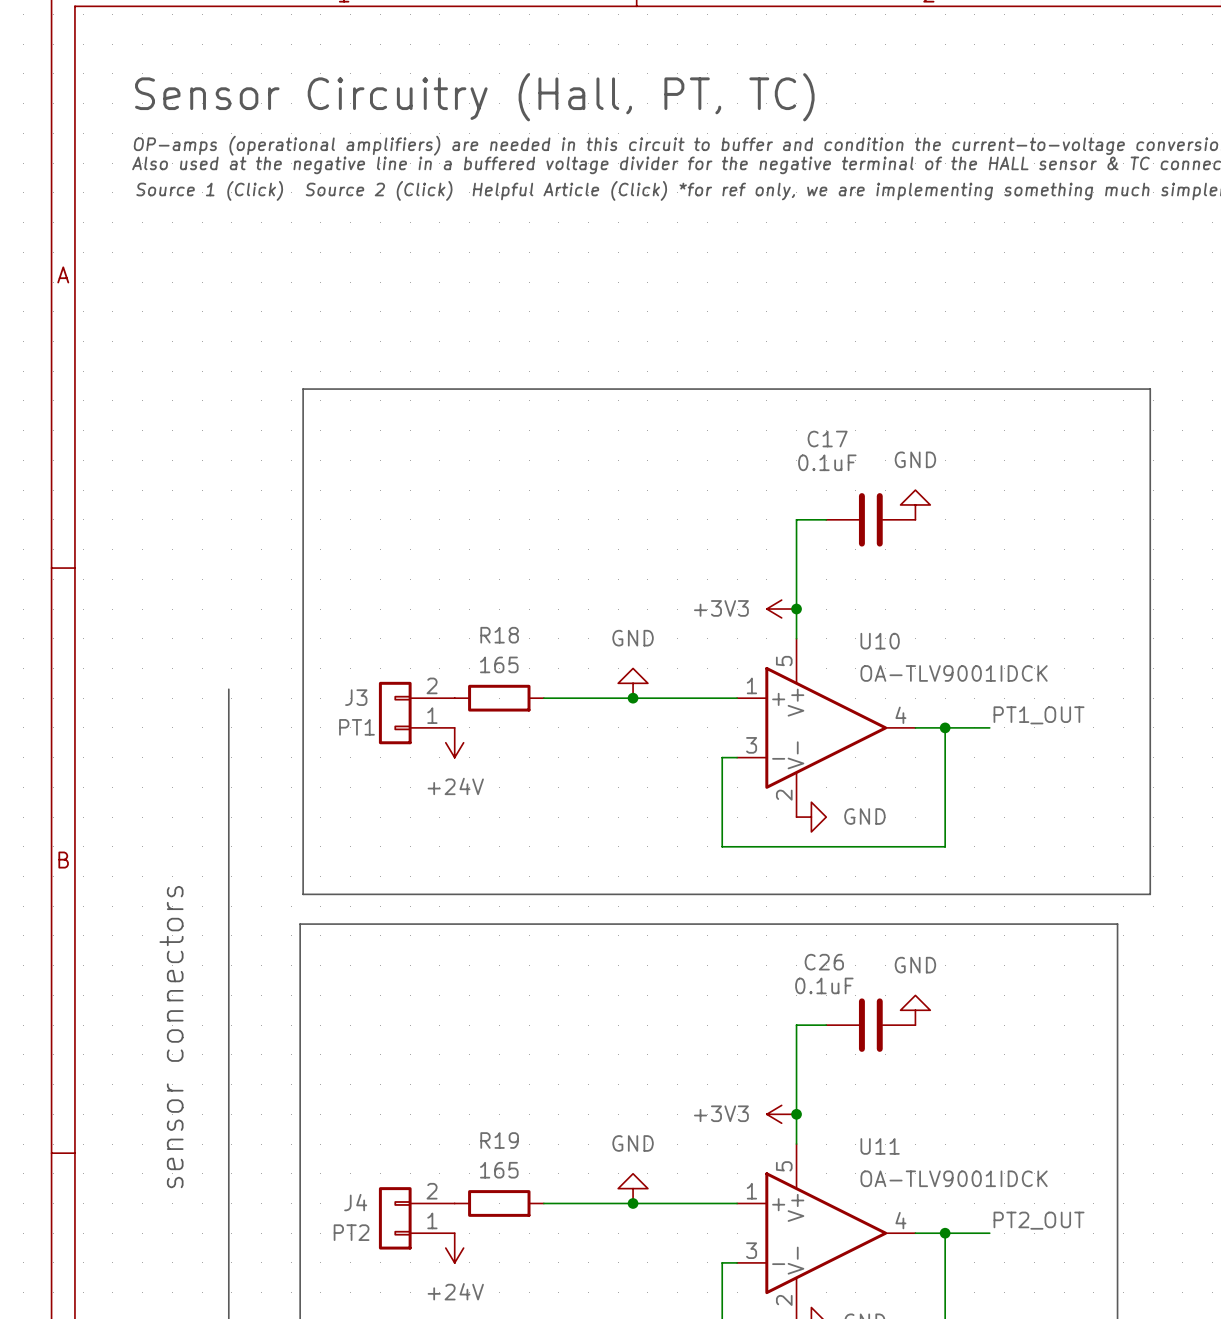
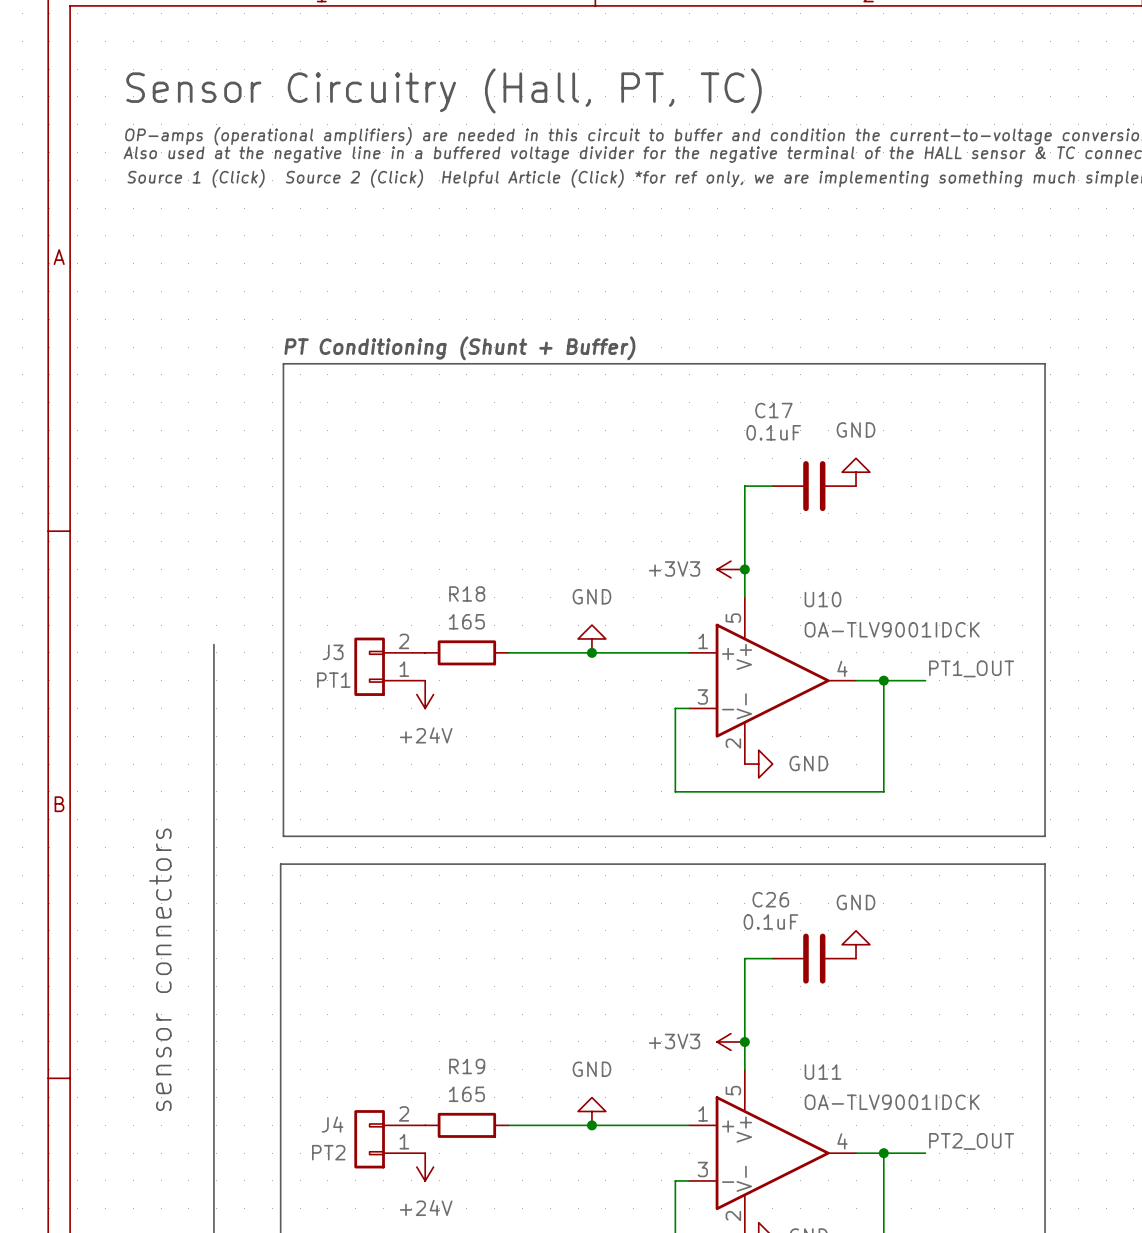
text: none -> PT Conditioning (Shunt + Buffer) (459, 348)
line: (1117, 389) (1150, 389) (1150, 894) (1117, 894) -> (1045, 363) (1045, 836)

